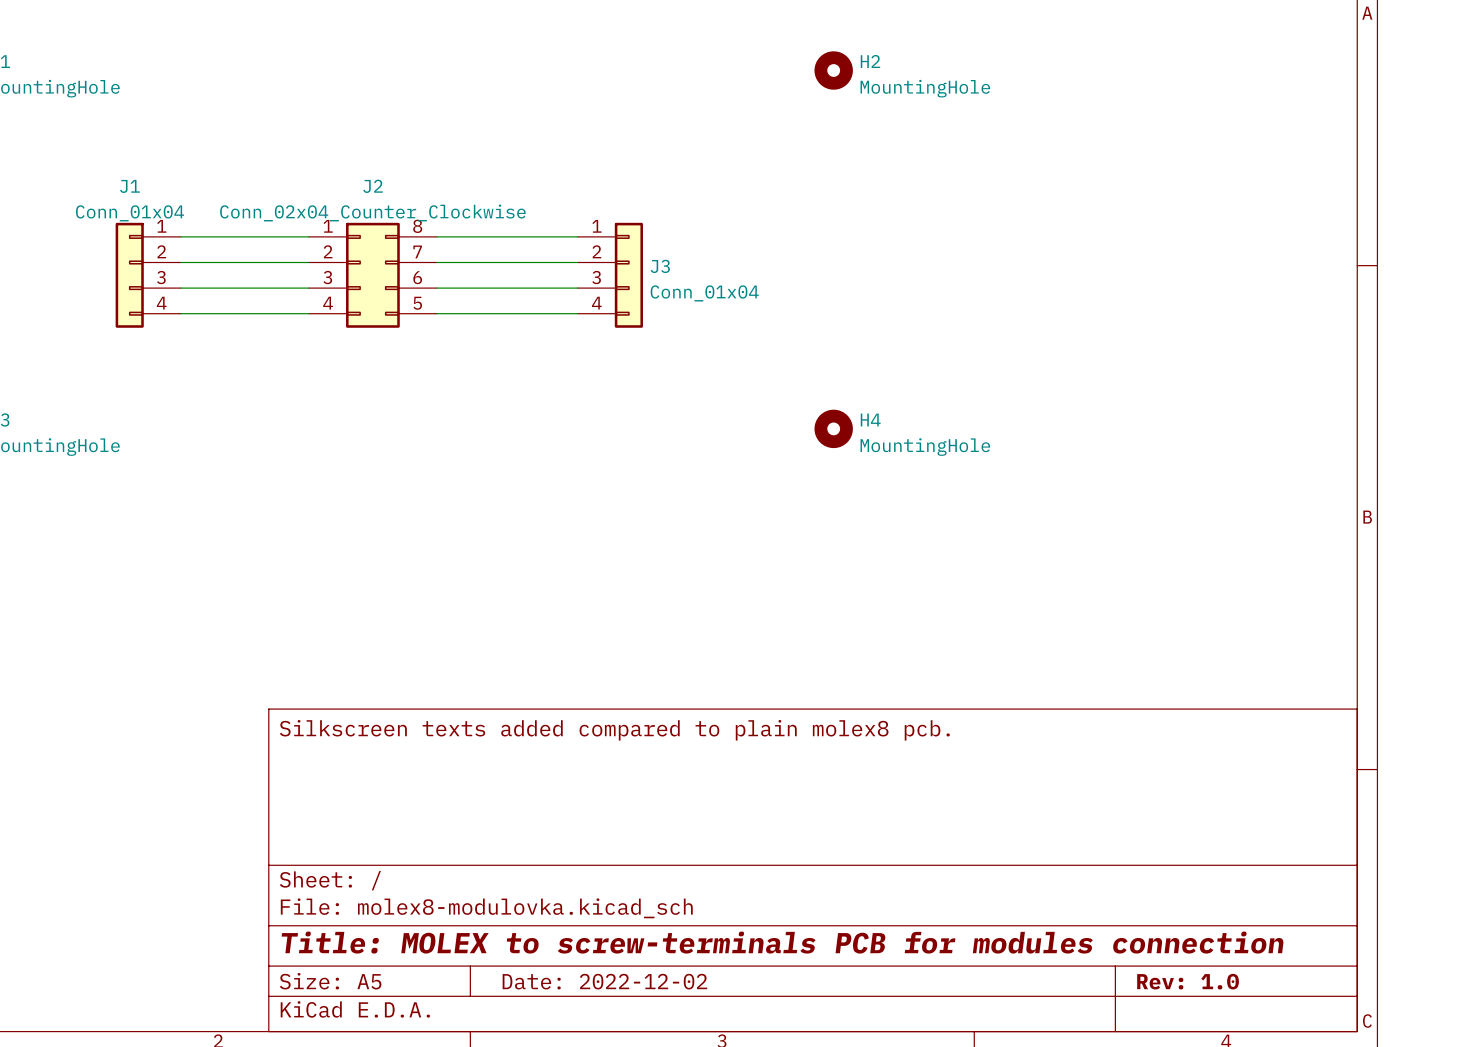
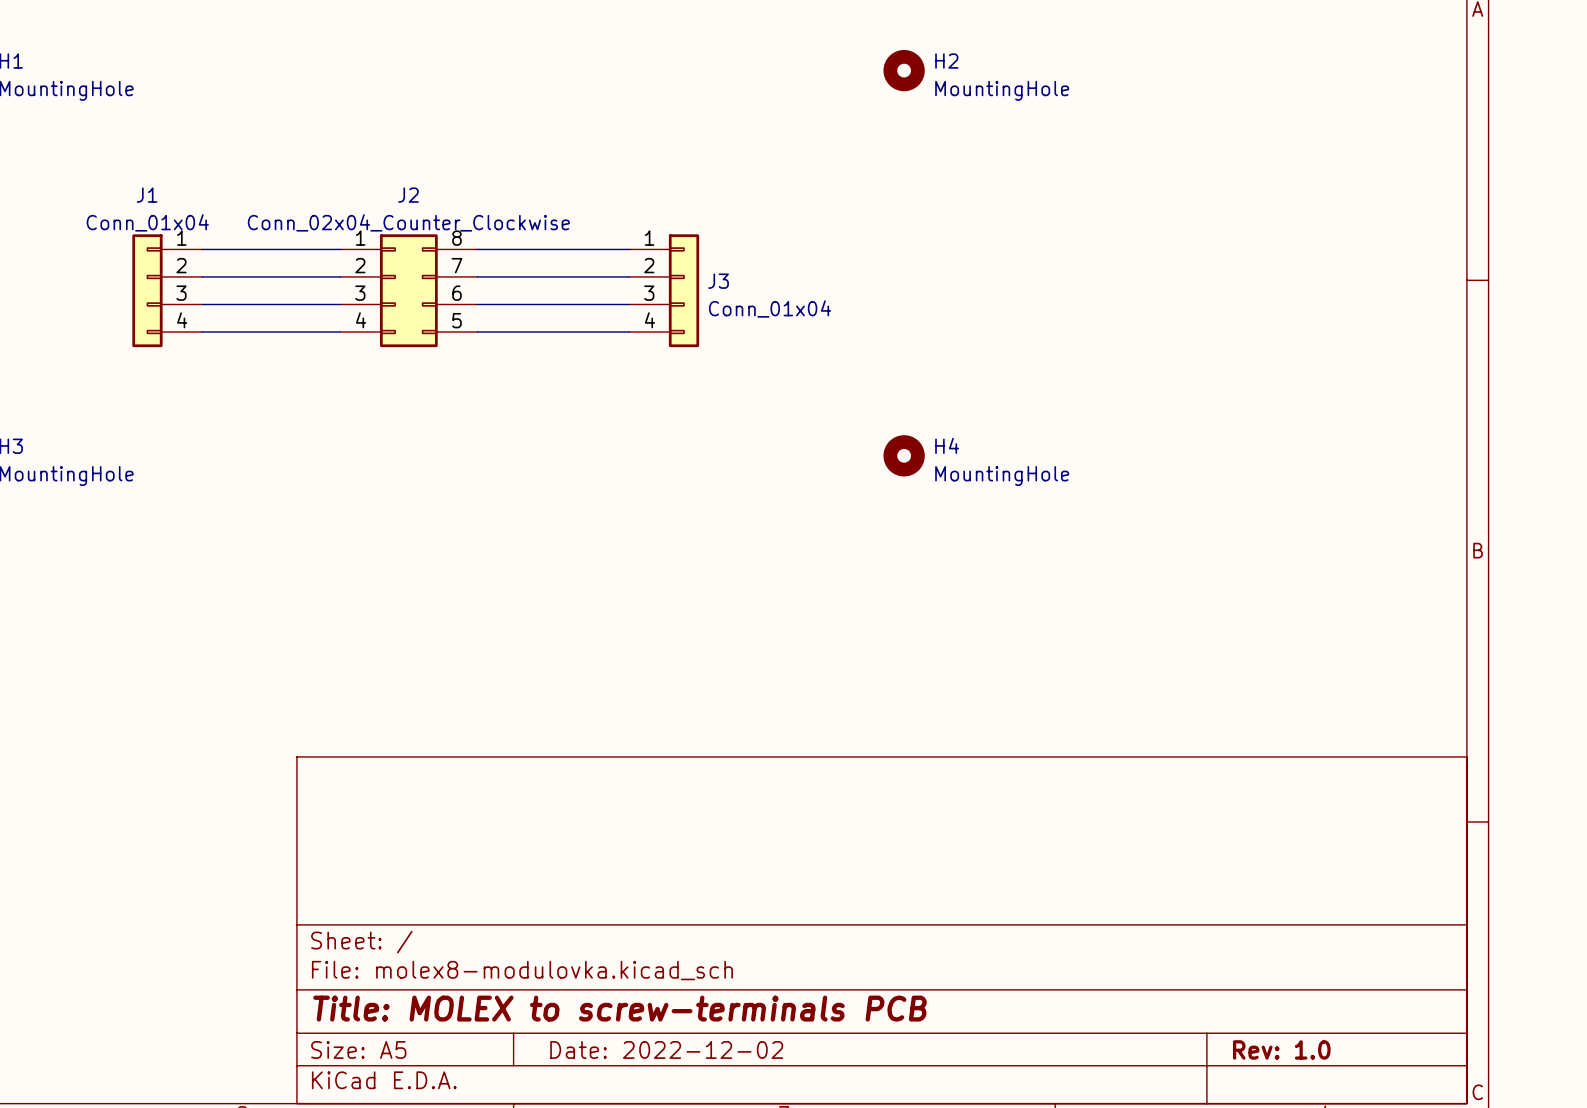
title block: Silkscreen texts added compared to plain molex8 pcb. (614, 730) -> none
title block: Title: MOLEX to screw-terminals PCB for modules connection (782, 942) -> Title: MOLEX to screw-terminals PCB (620, 1008)

